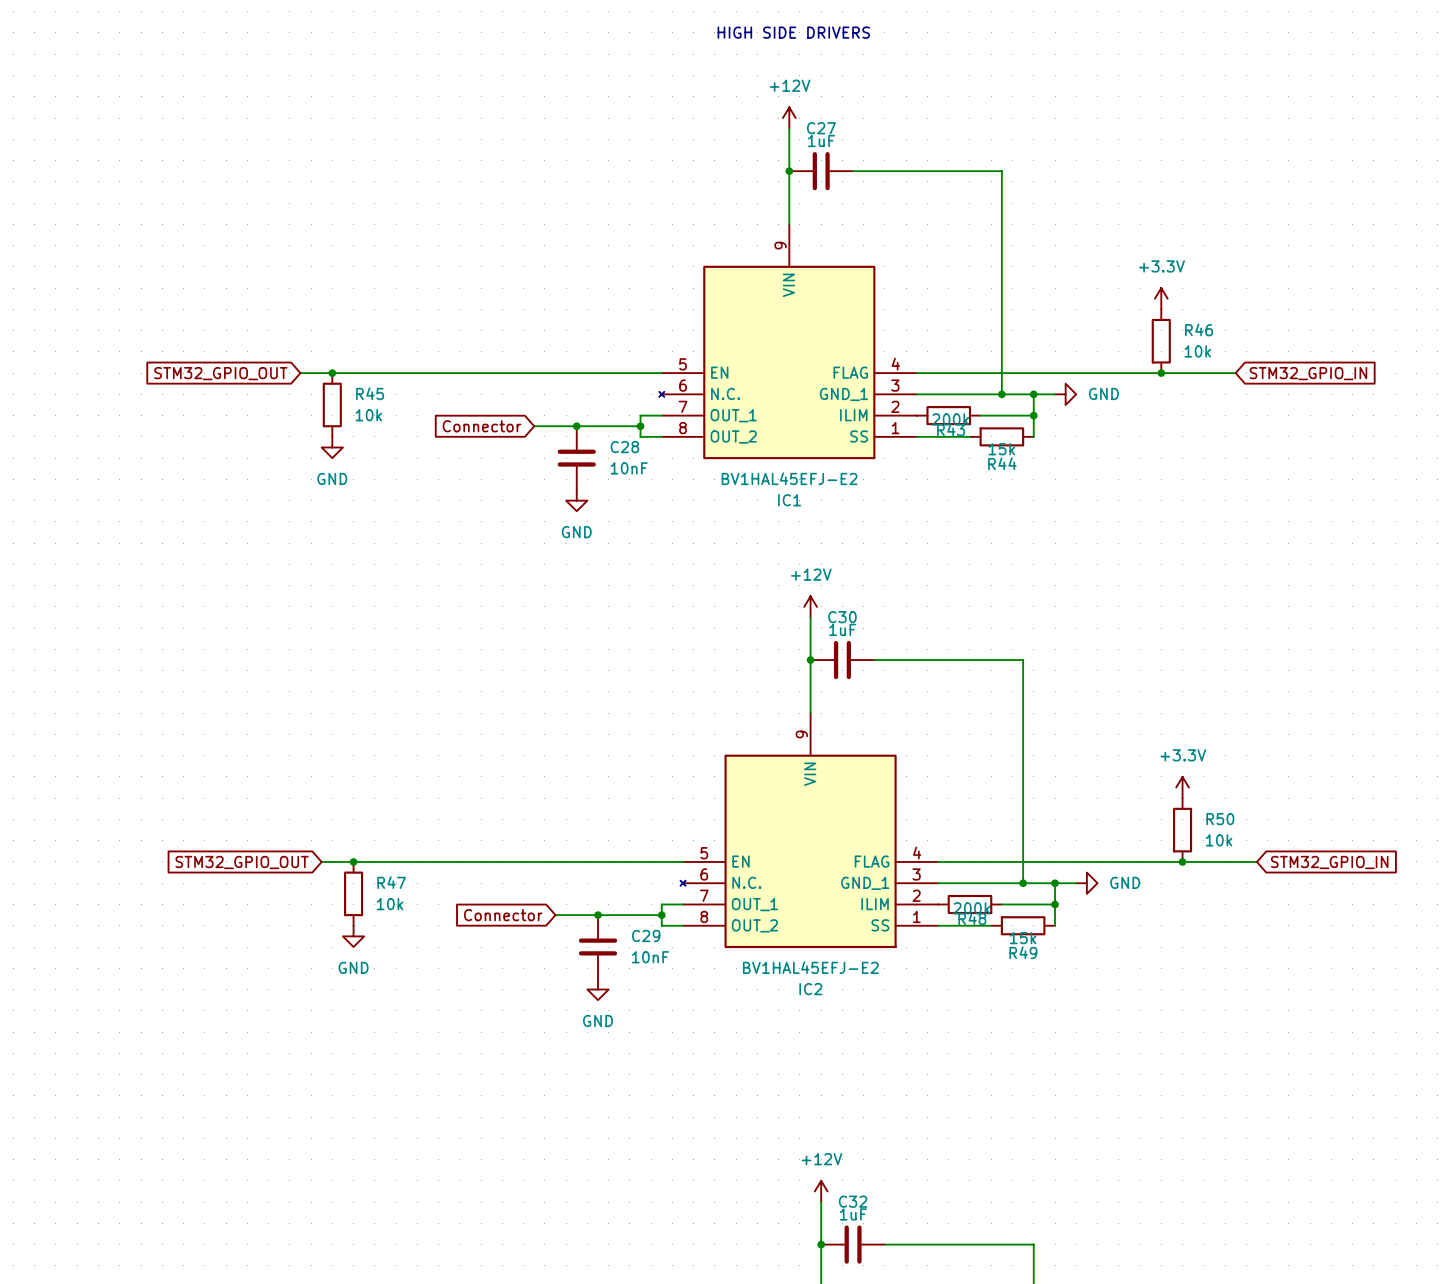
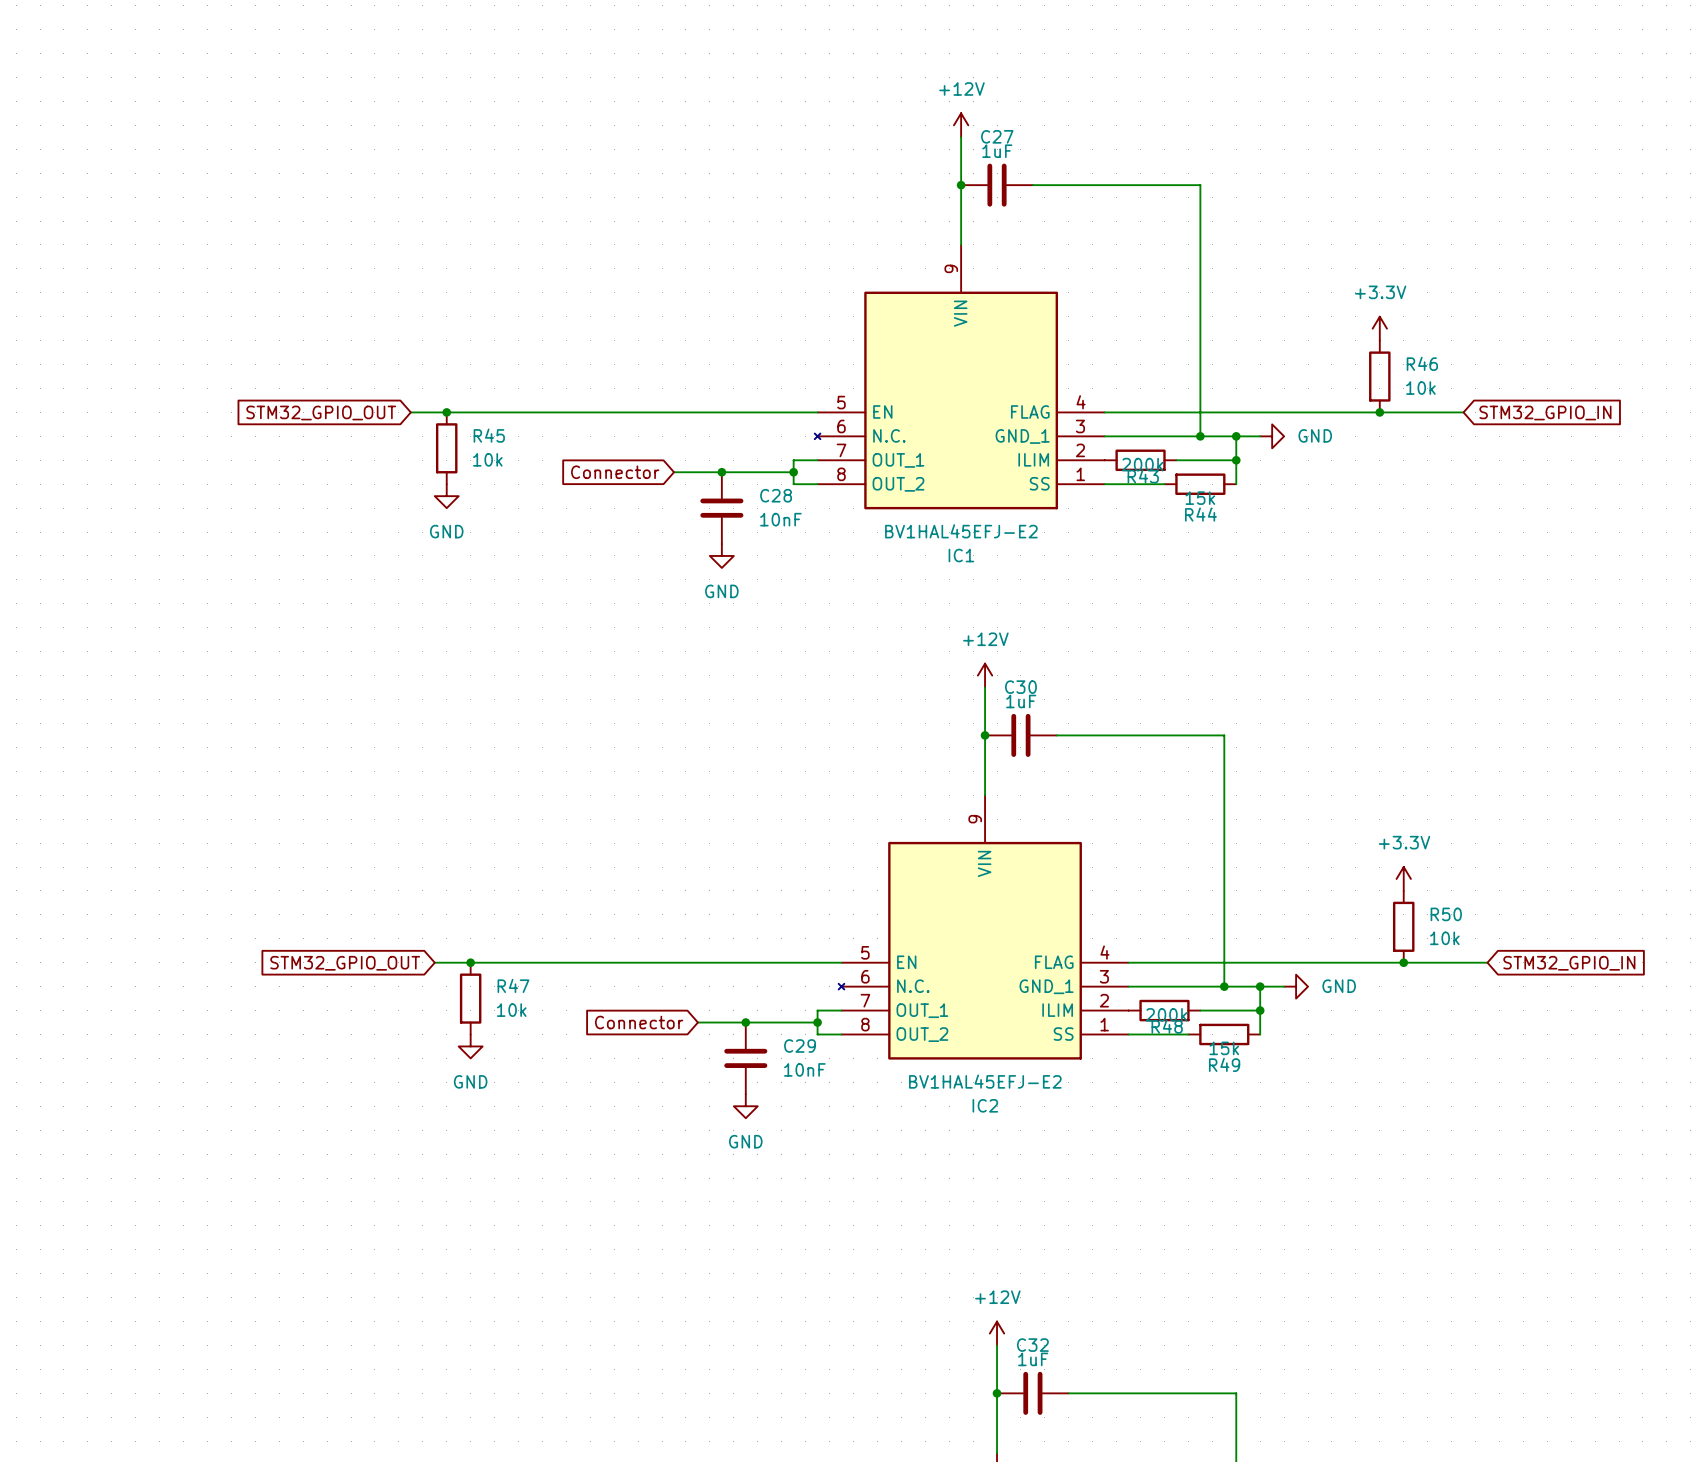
text: HIGH SIDE DRIVERS (793, 32) -> none

